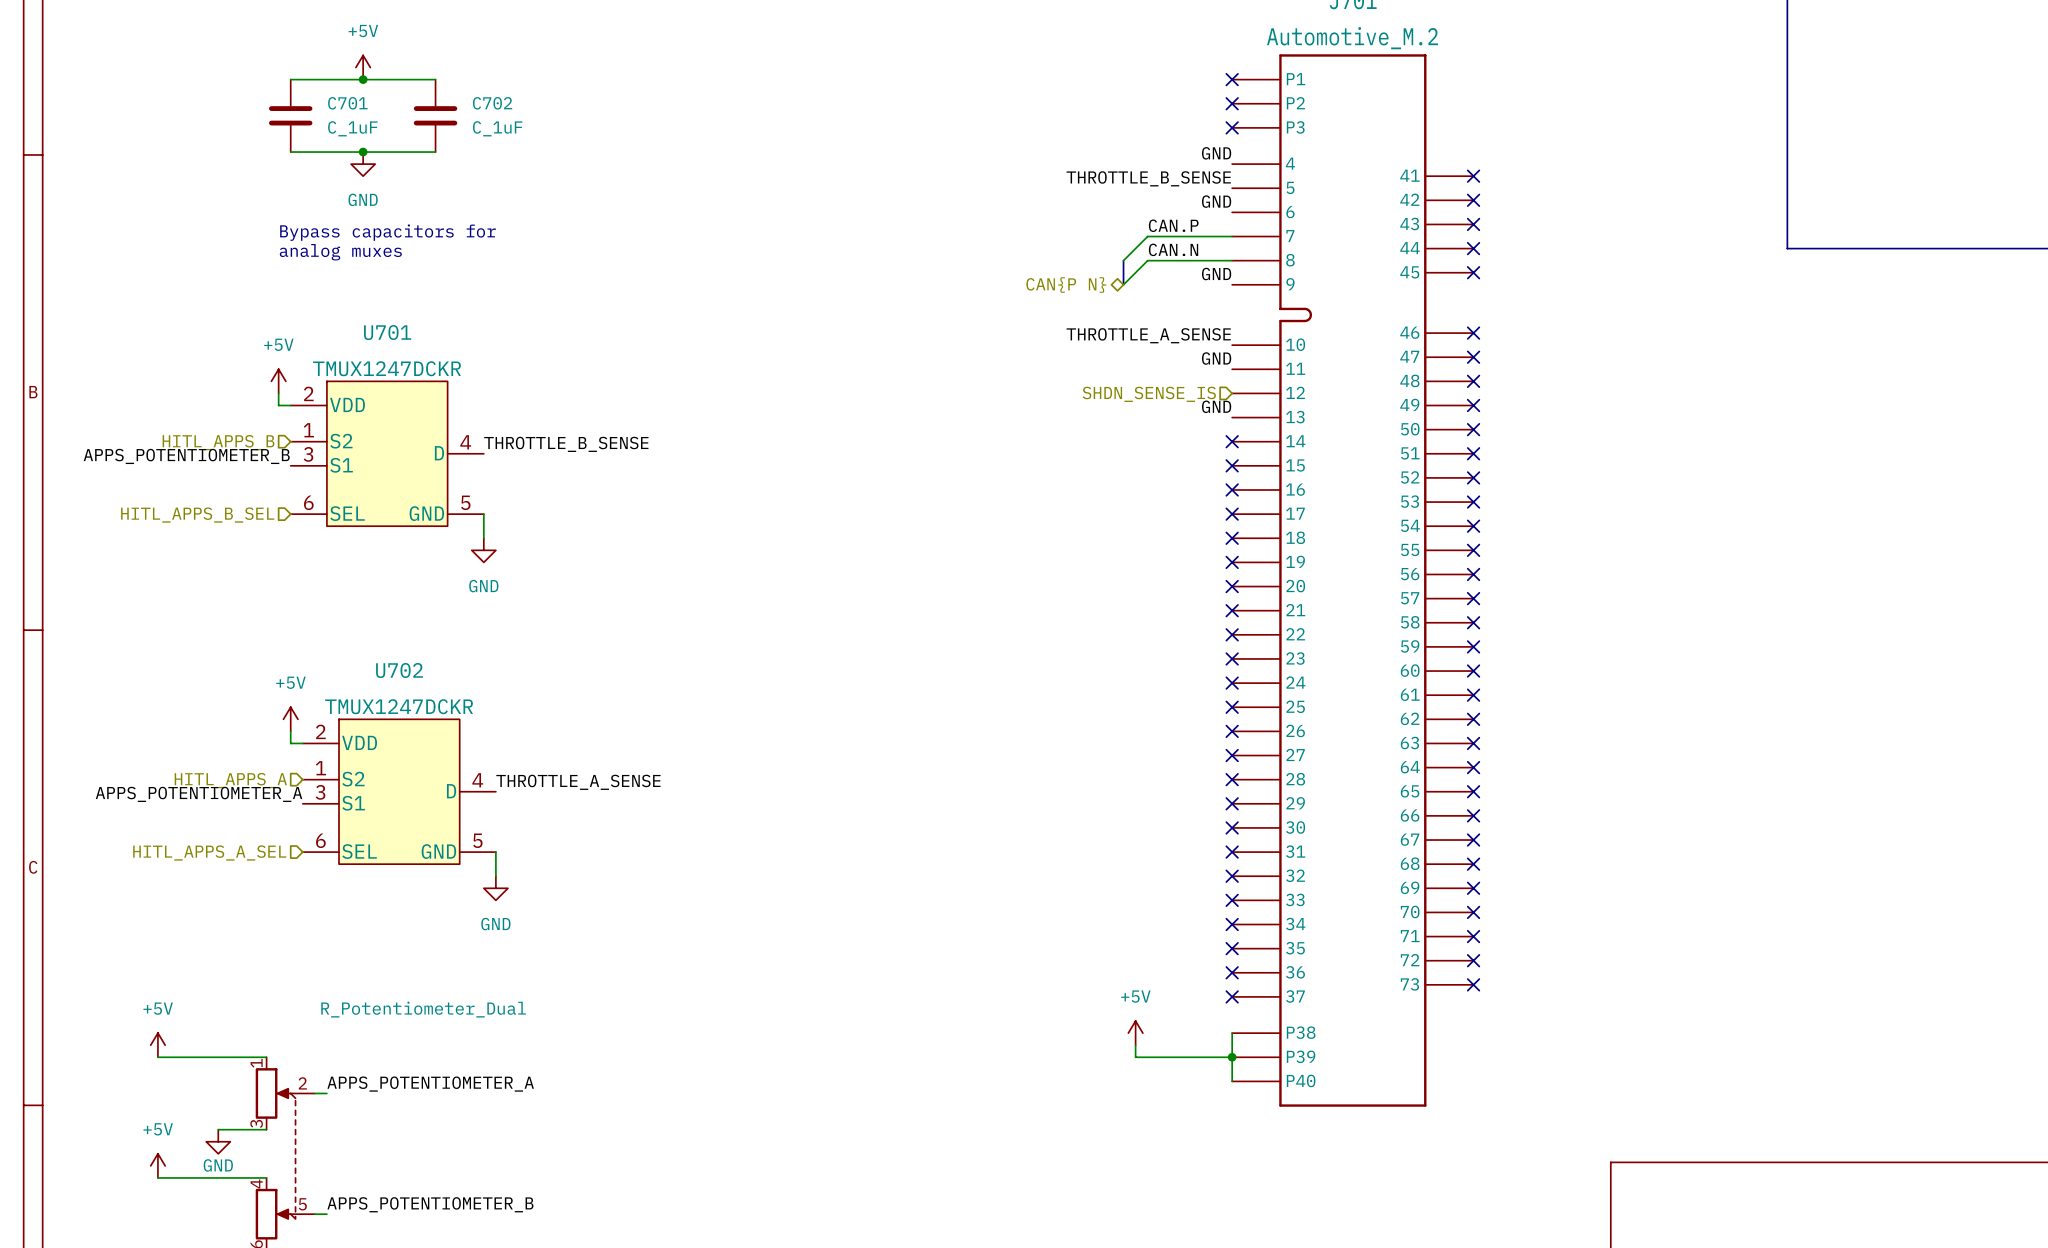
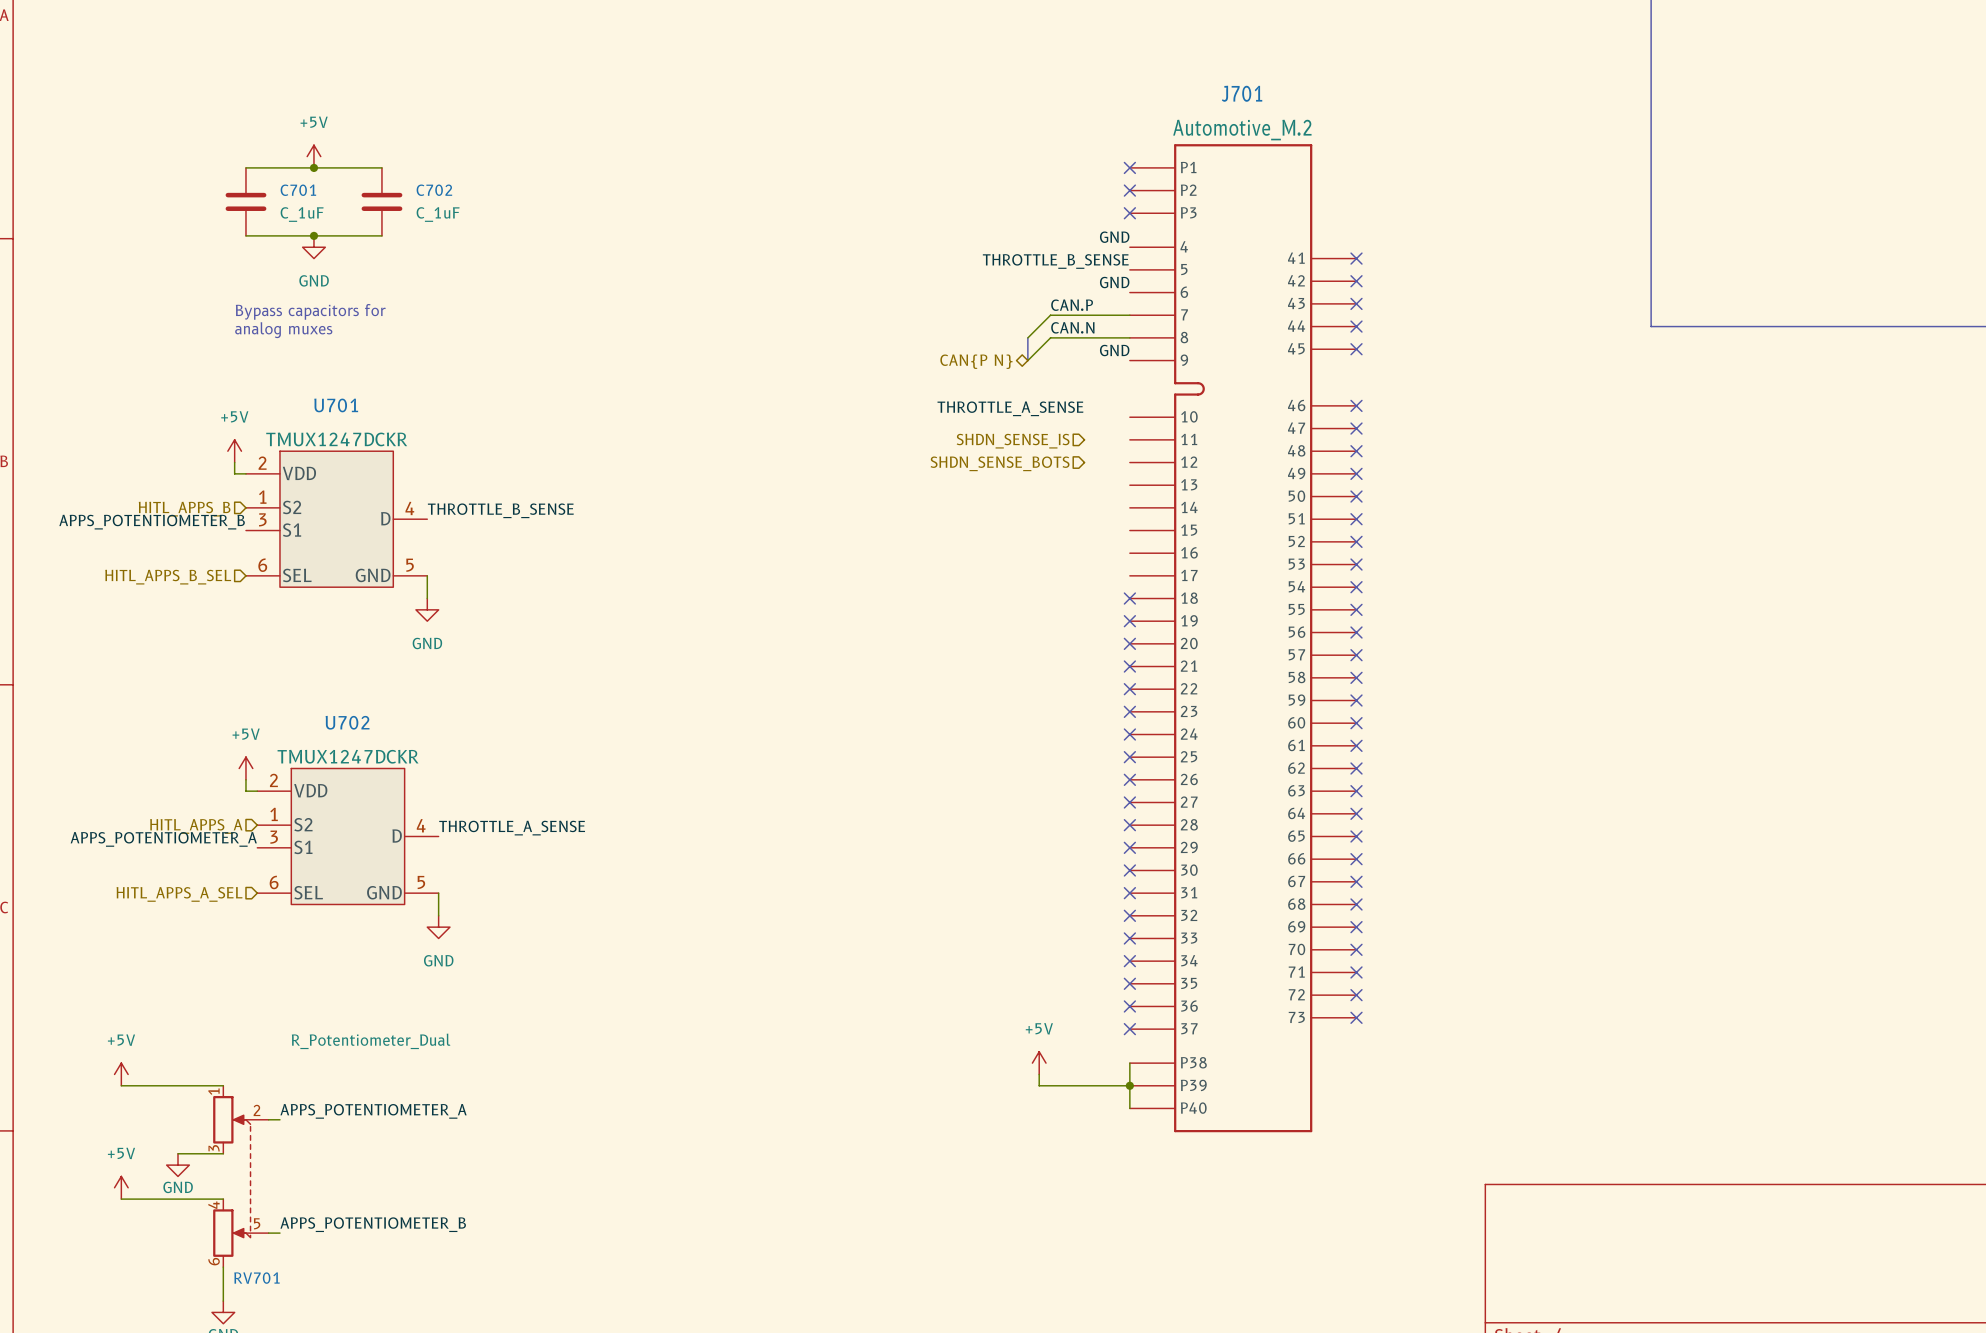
label position: THROTTLE_A_SENSE (1148, 335) -> THROTTLE_A_SENSE (1010, 408)
label: GND (1216, 358) -> none
hierarchical label: none -> SHDN_SENSE_BOTS (1000, 463)
hierarchical label position: SHDN_SENSE_IS (1149, 394) -> SHDN_SENSE_IS (1013, 441)
label: GND (1216, 406) -> none
no-connect mark: (1232, 441) -> none
no-connect mark: (1232, 465) -> none
no-connect mark: (1232, 489) -> none
no-connect mark: (1232, 514) -> none

